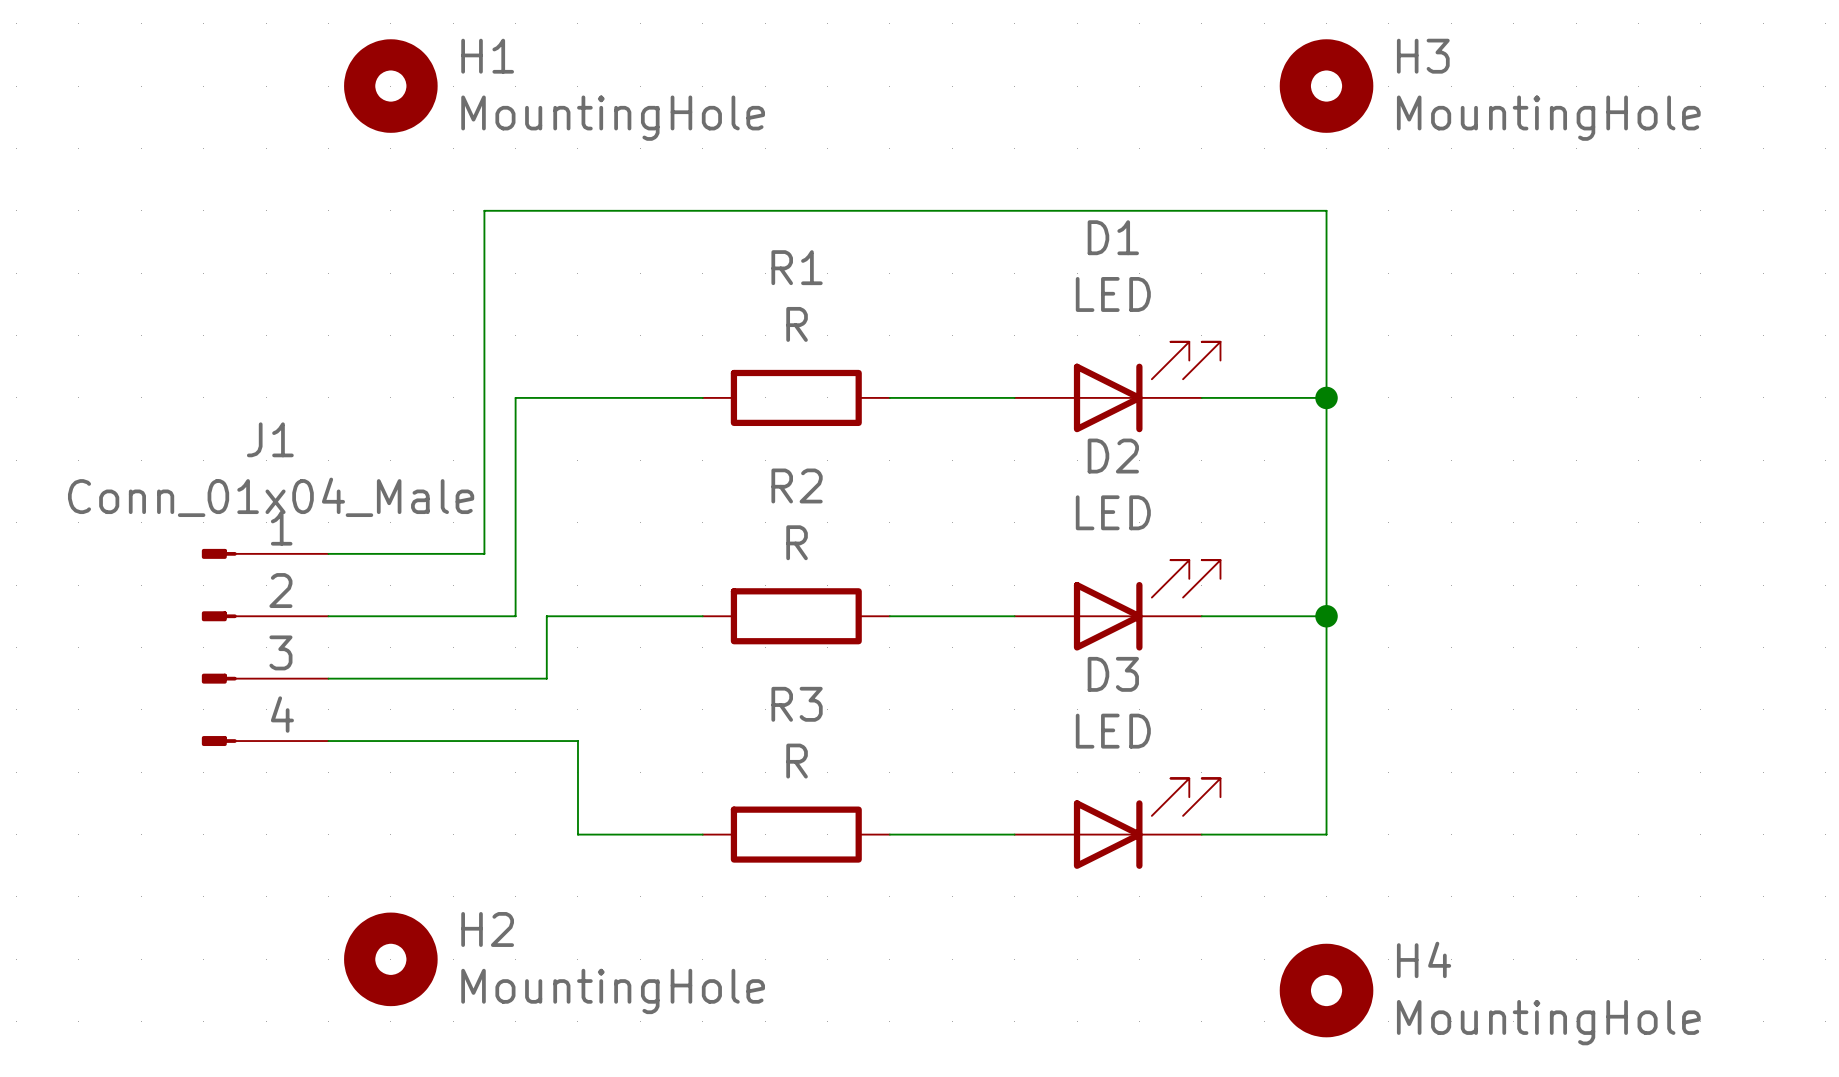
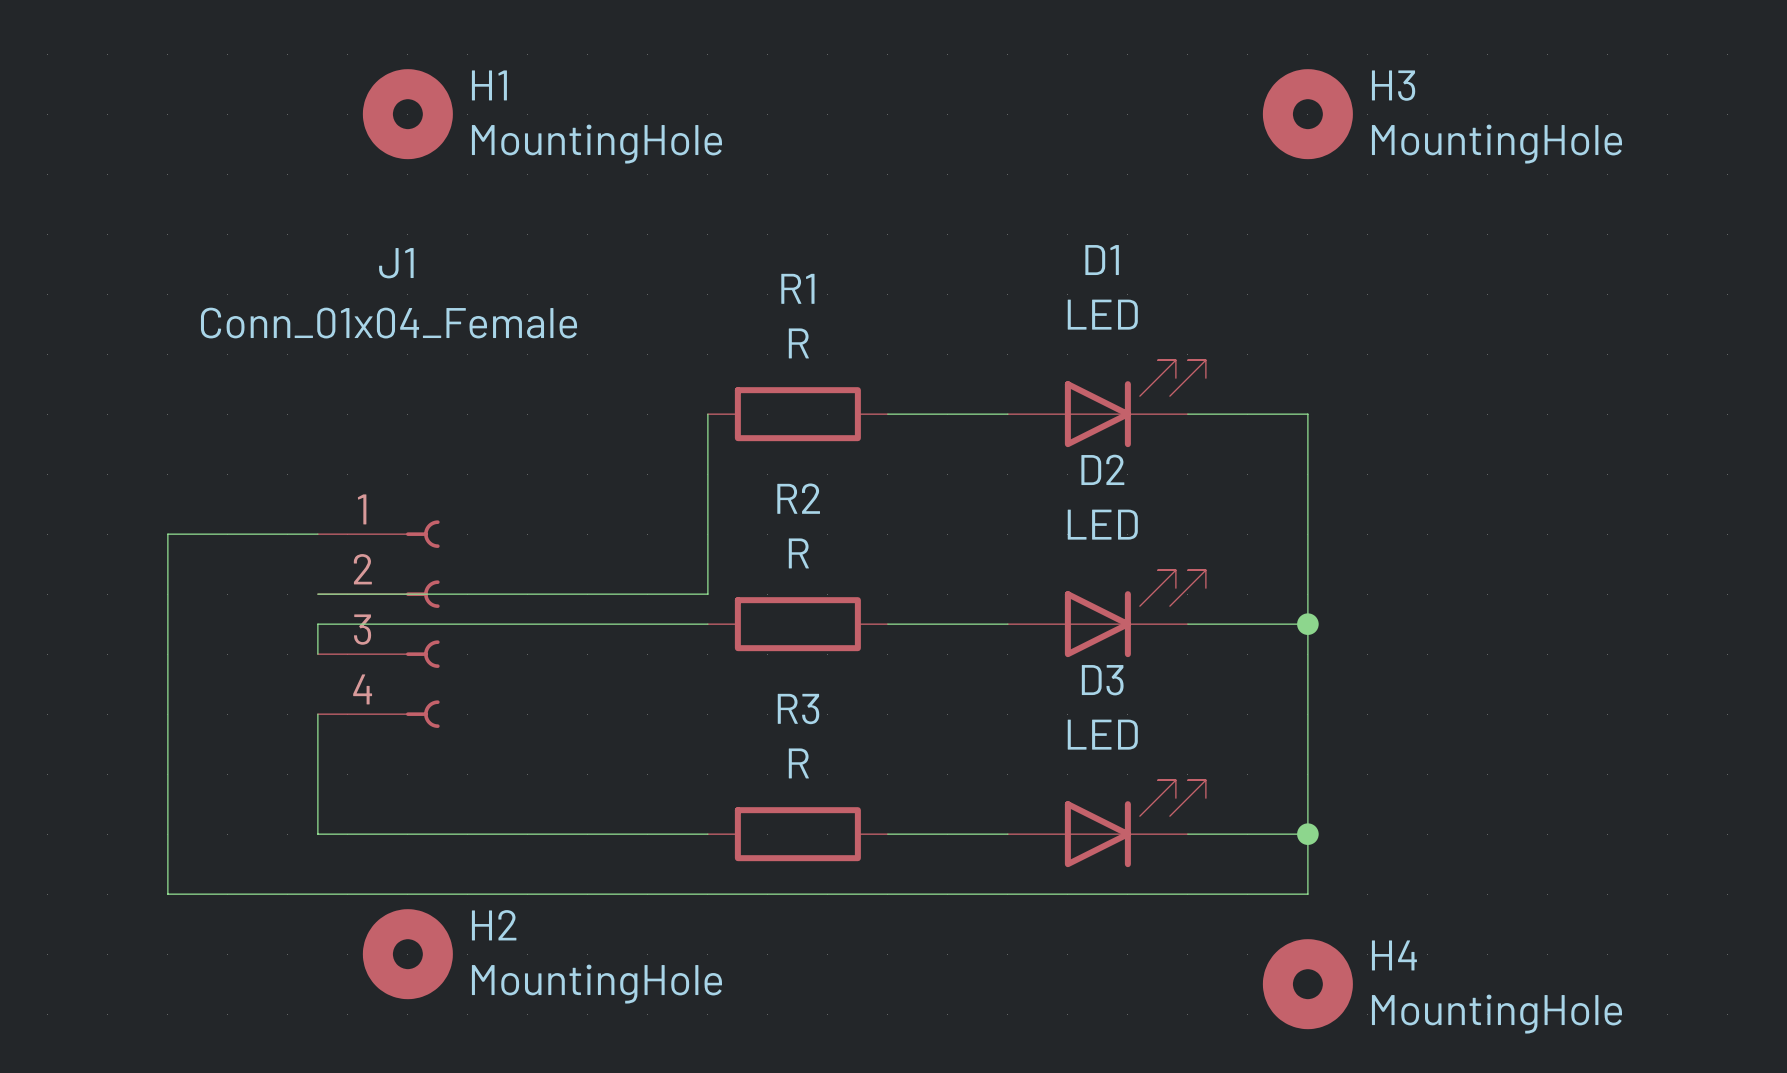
wire: (702, 397) (515, 397) (515, 616) -> (707, 414) (707, 594) (317, 594)
wire: (1326, 397) (1326, 210) (484, 210) (484, 553) (328, 553) -> none
junction: (1326, 397) -> none
J1 name position: J1 (270, 439) -> J1 (396, 263)
J1 value: Conn_01x04_Male (271, 497) -> Conn_01x04_Female (389, 323)
wire: none -> (317, 534) (167, 534) (167, 894) (1307, 894) (1307, 834)
J1 symbol: [201, 548, 329, 747] -> [317, 520, 440, 728]
wire: none -> (347, 624) (317, 624) (317, 654)
wire: (546, 616) (546, 678) (328, 678) -> (557, 624) (527, 624)
wire: (328, 741) (577, 741) (577, 834) -> (317, 714) (317, 834) (587, 834)
junction: none -> (1307, 834)

